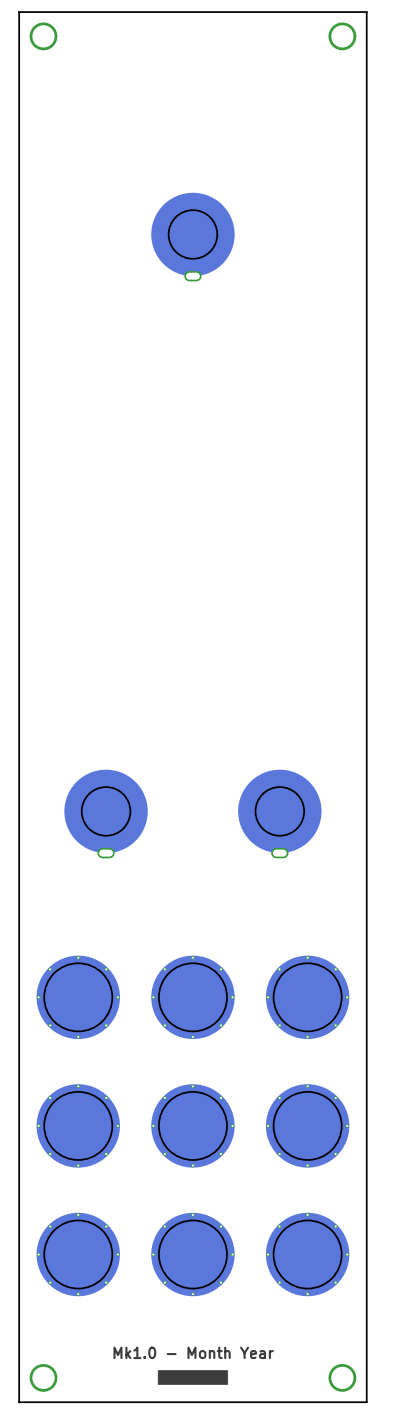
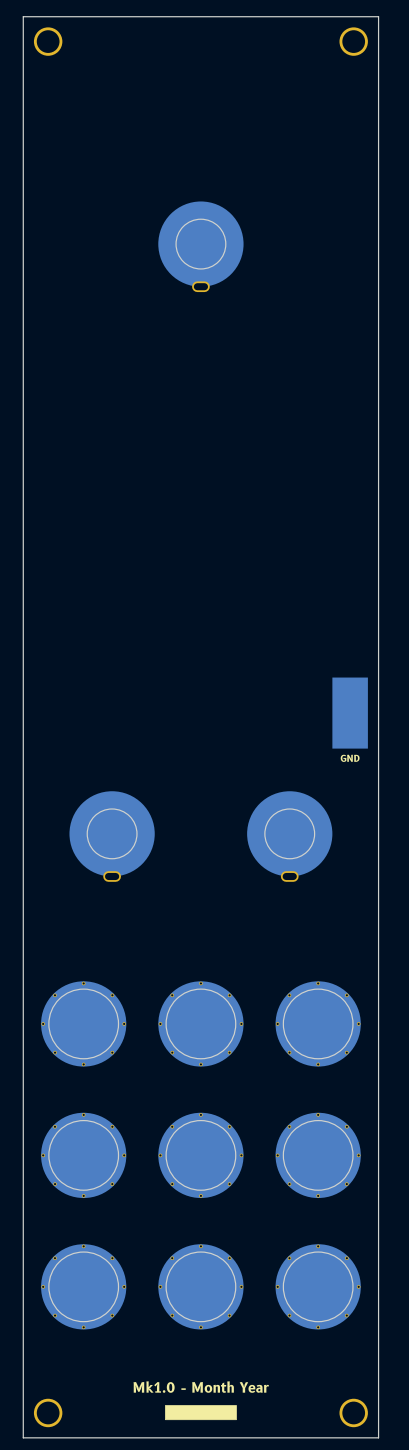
part: none -> (350, 713)

